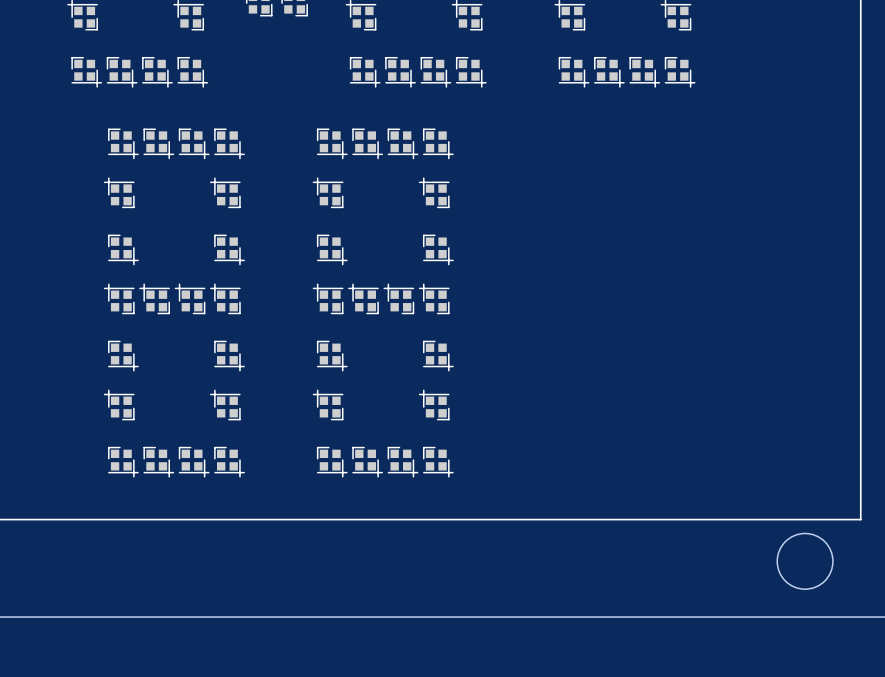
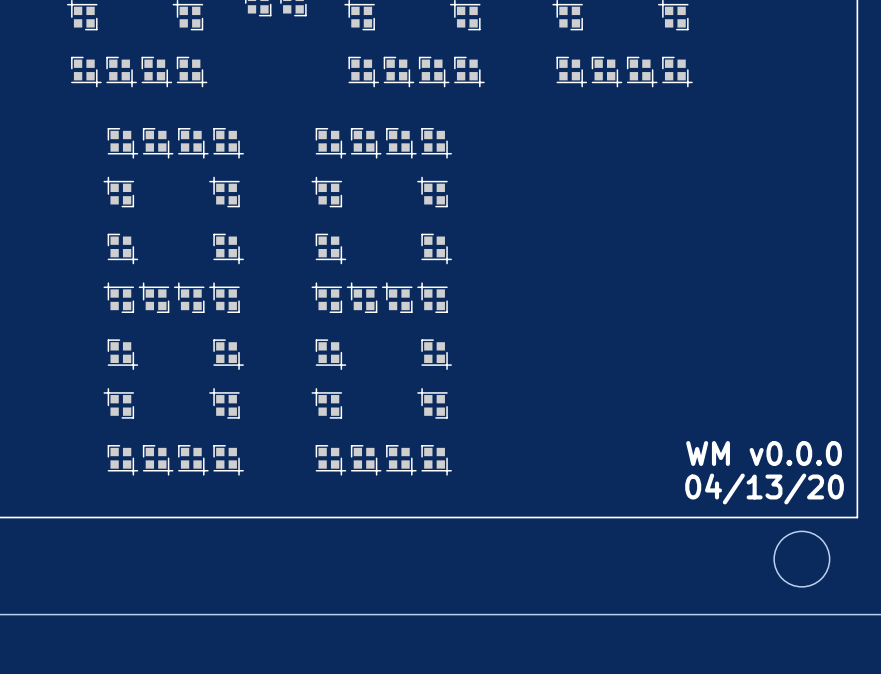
text: none -> WM v0.0.0 (764, 453)
text: none -> 04/13/20 (764, 488)

